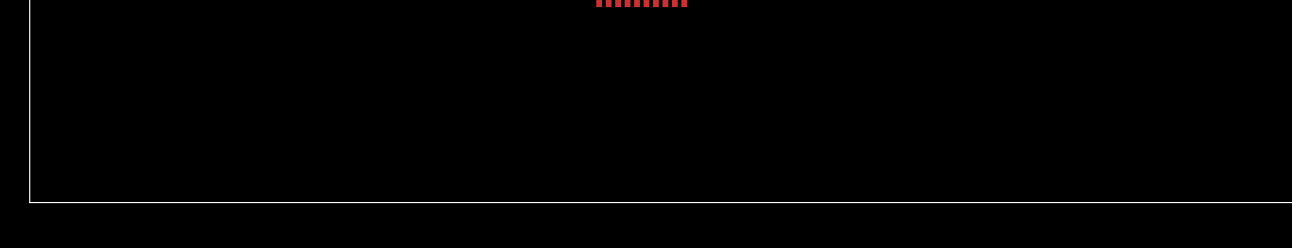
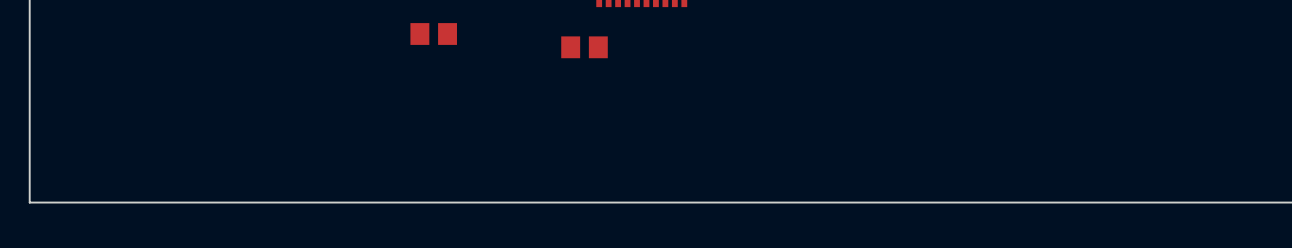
part: none -> (433, 34)
part: none -> (584, 47)

